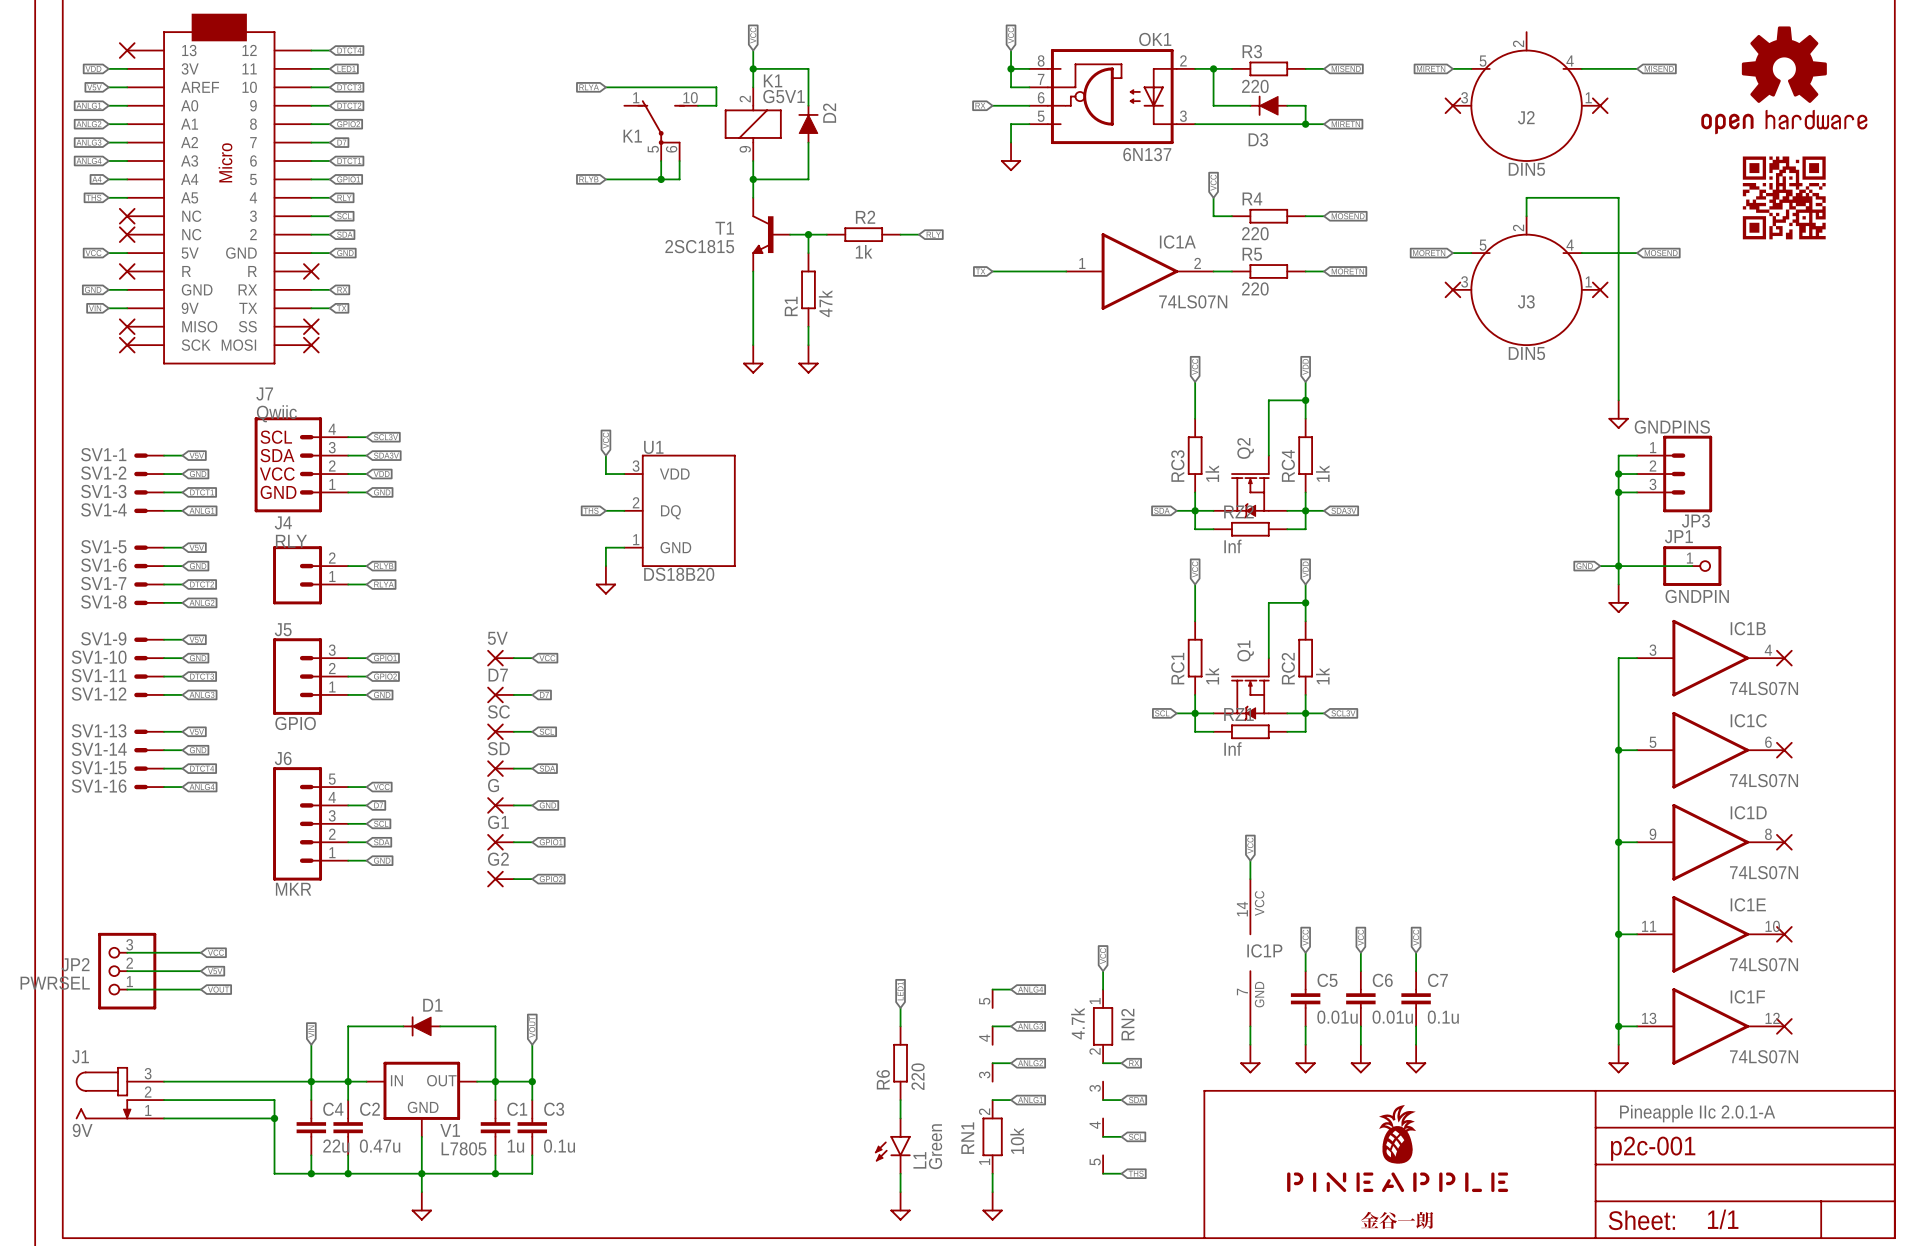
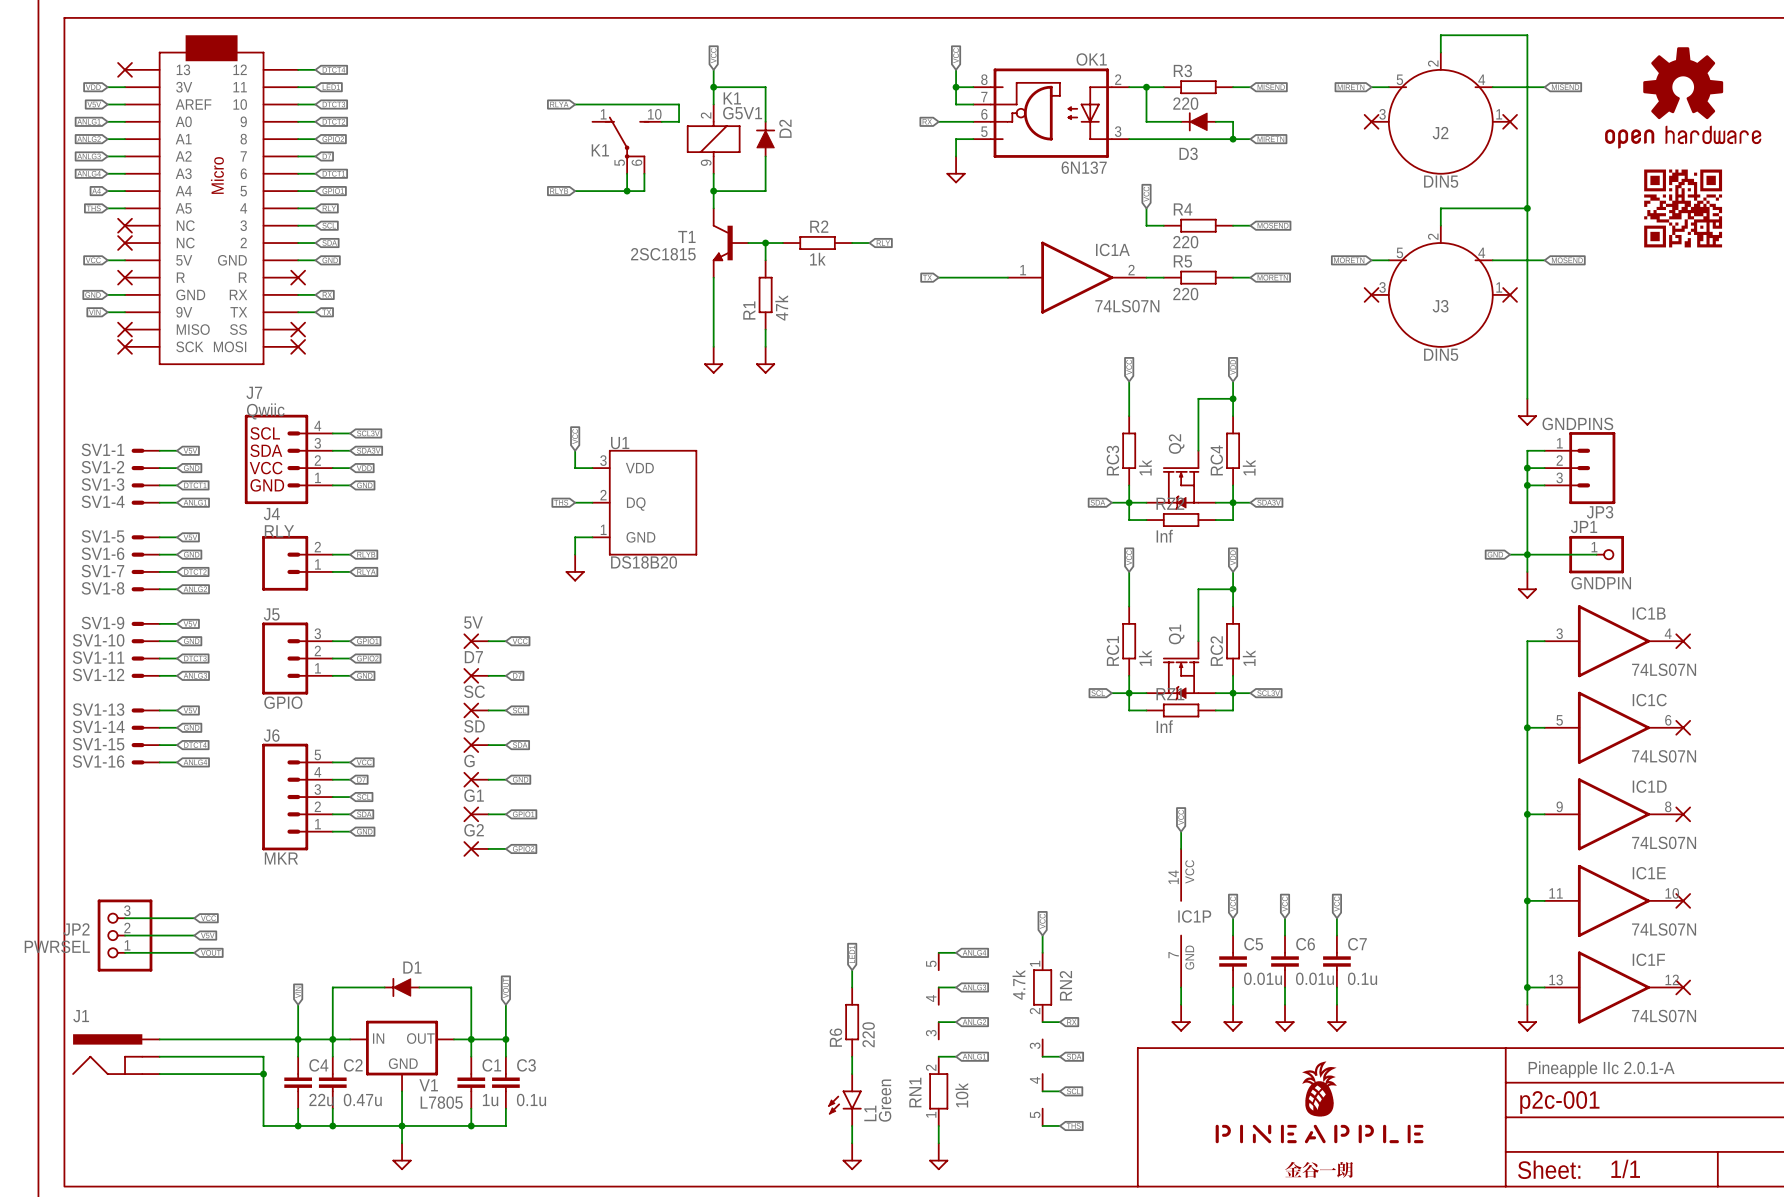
wire: none -> (1440, 52) (1440, 35) (1527, 35) (1527, 208)
junction: none -> (1527, 208)
J1 symbol: [76, 1067, 165, 1120] -> [72, 1034, 160, 1075]
J1 value: 9V (82, 1130) -> none

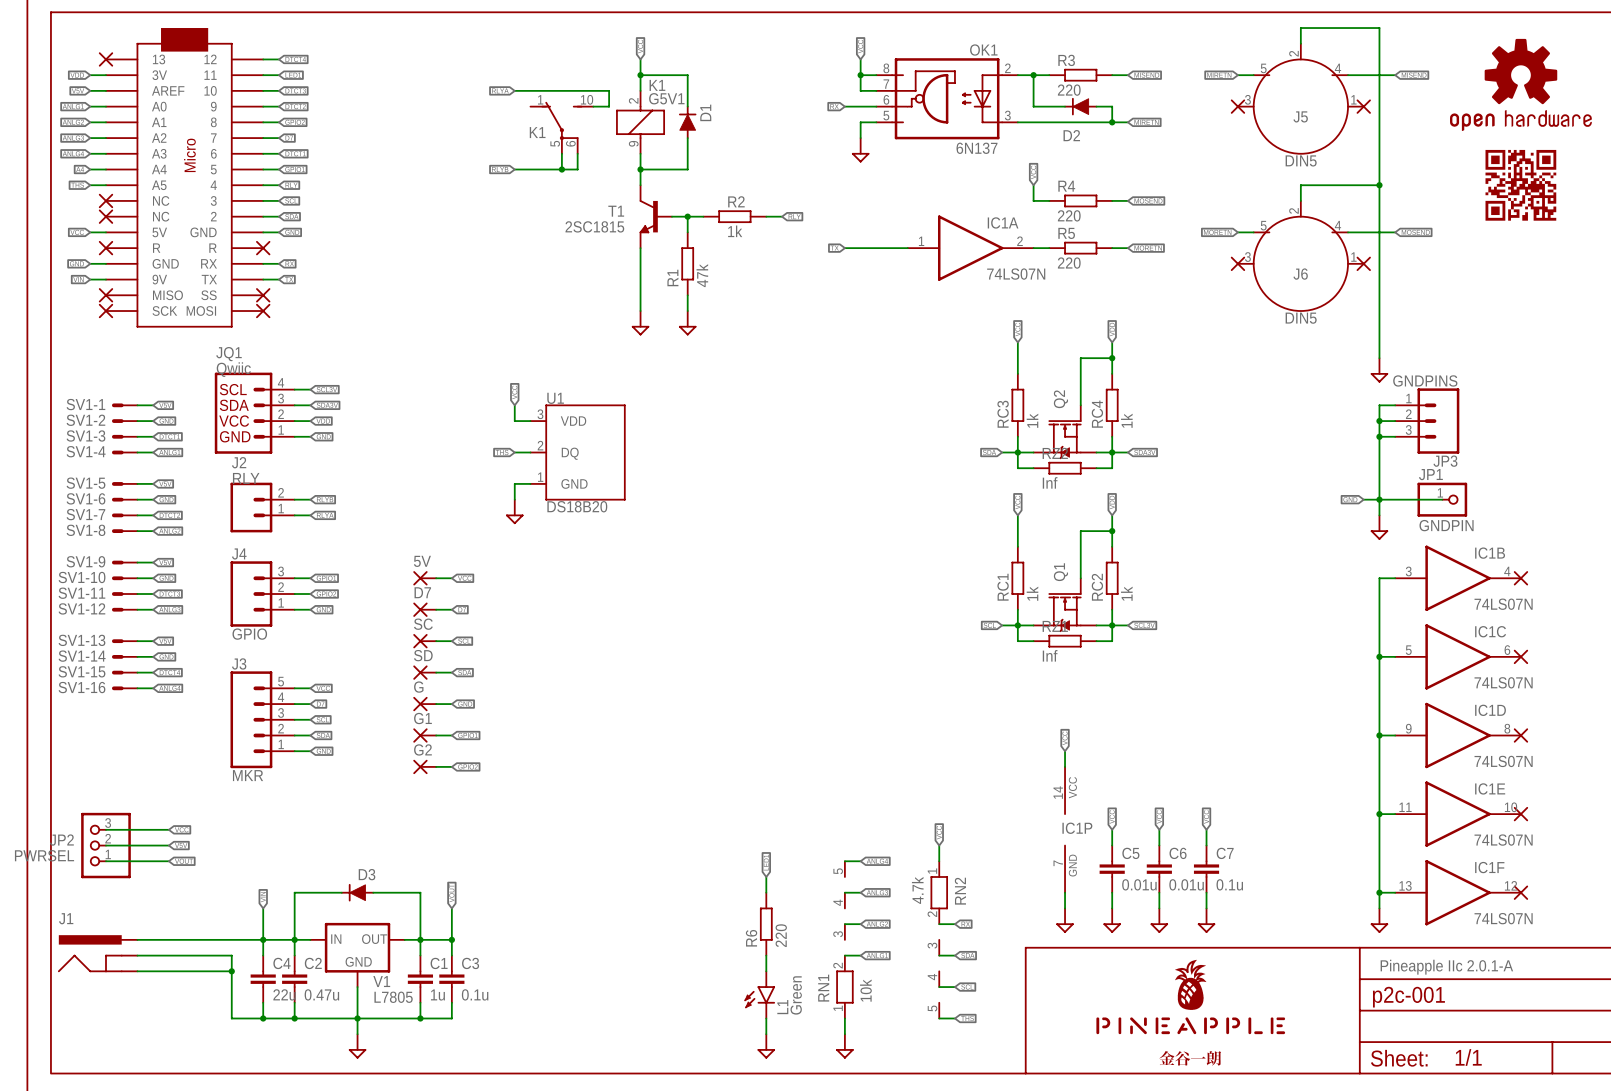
D2 name: D2 (785, 128) -> D1 (705, 112)
J2 name: J2 (1440, 133) -> J5 (1300, 116)
D3 name: D3 (1188, 153) -> D2 (1071, 135)
J3 name: J3 (1440, 306) -> J6 (1300, 274)
J7 name: J7 (254, 392) -> JQ1 (229, 354)
J4 name: J4 (271, 514) -> J2 (239, 462)
J5 name: J5 (271, 614) -> J4 (239, 553)
J6 name: J6 (271, 735) -> J3 (239, 663)
D1 name: D1 (412, 967) -> D3 (367, 874)

